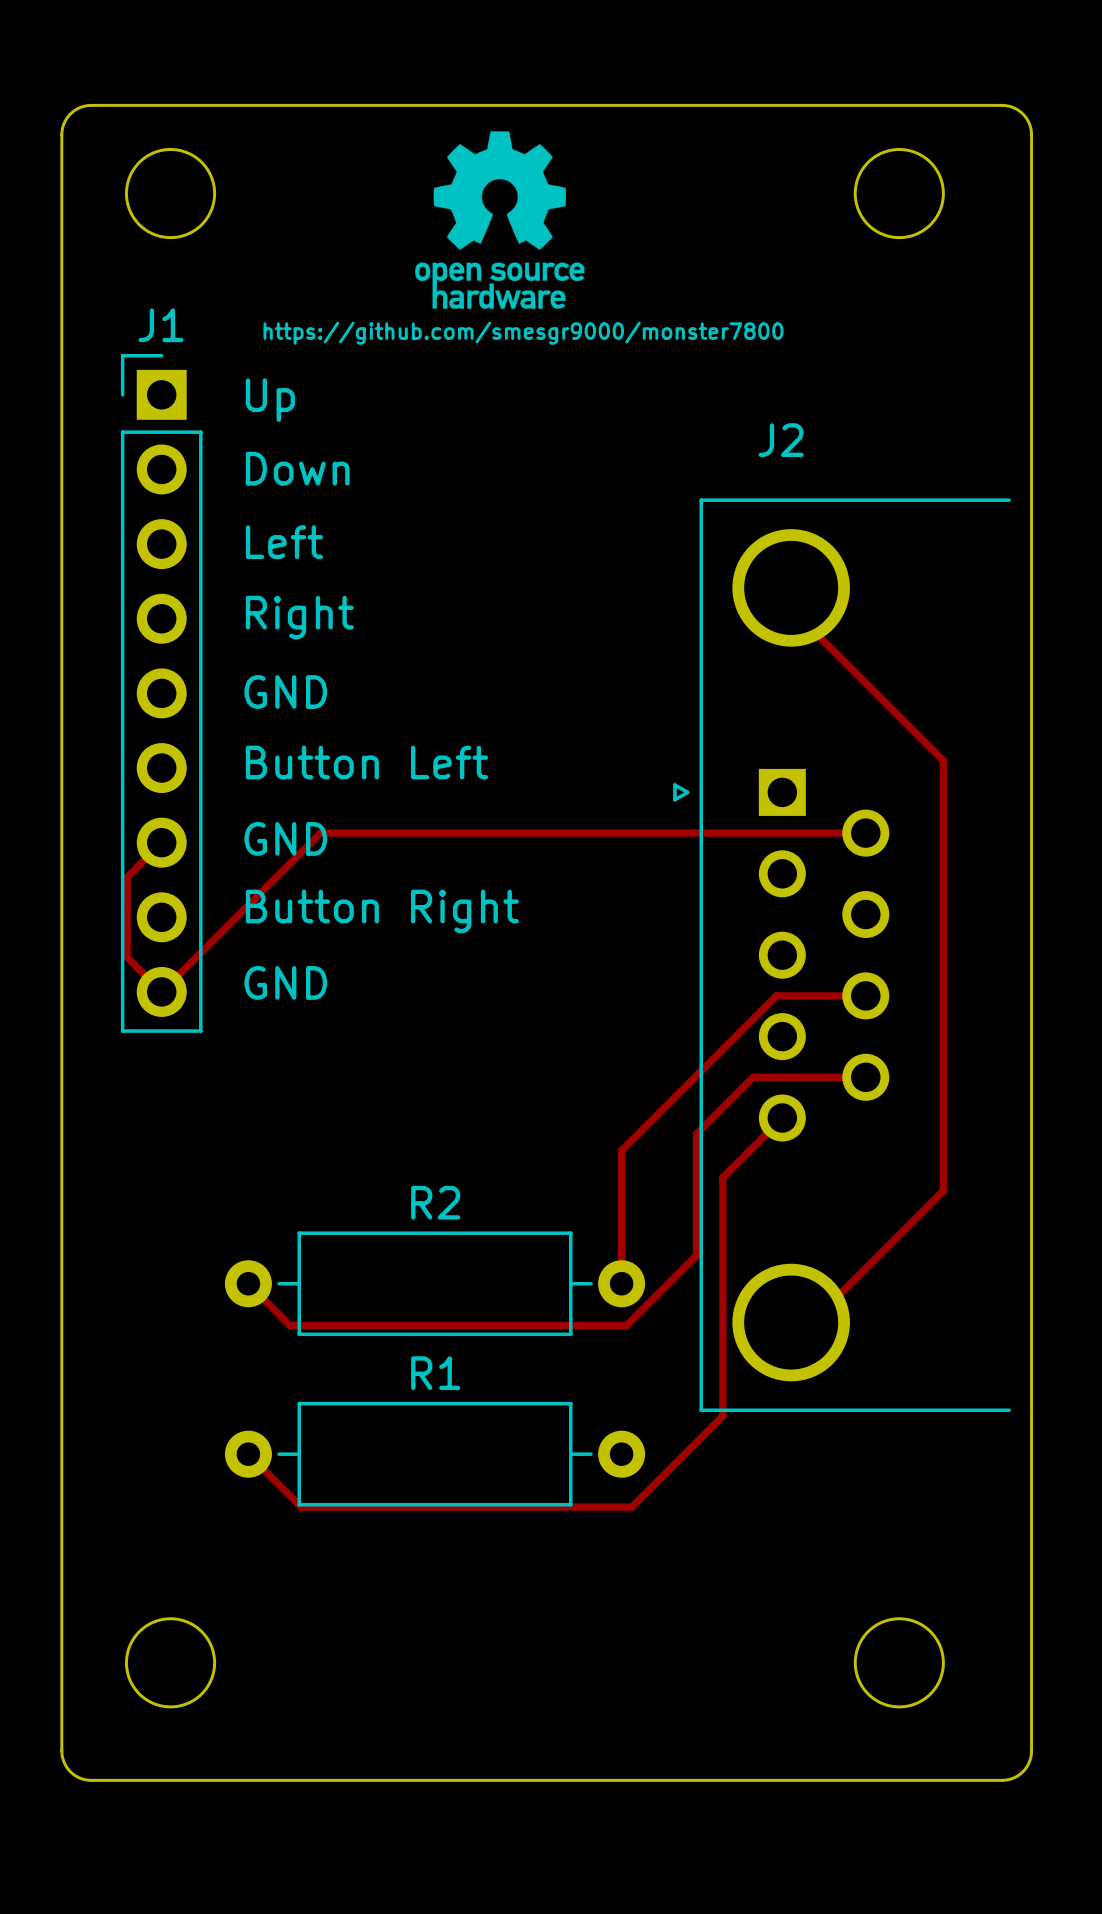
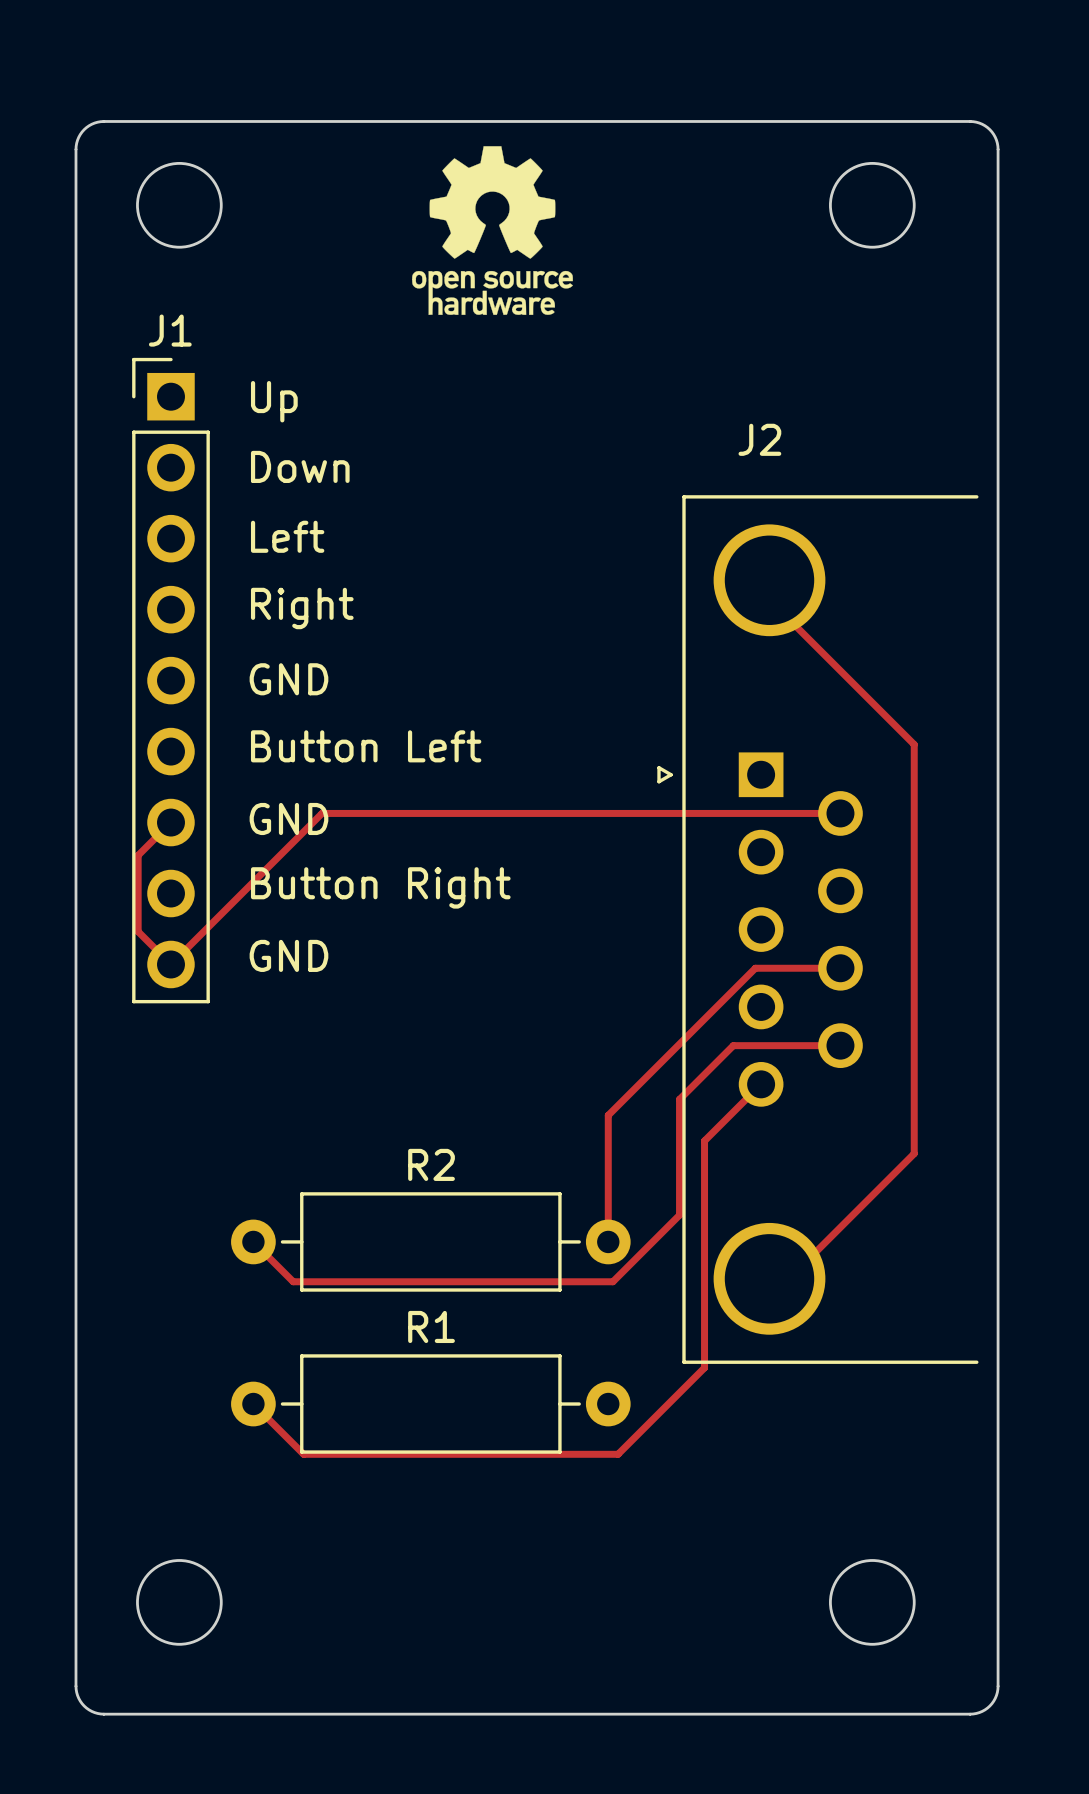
text: https://github.com/smesgr9000/monster7800 (523, 333) -> none

